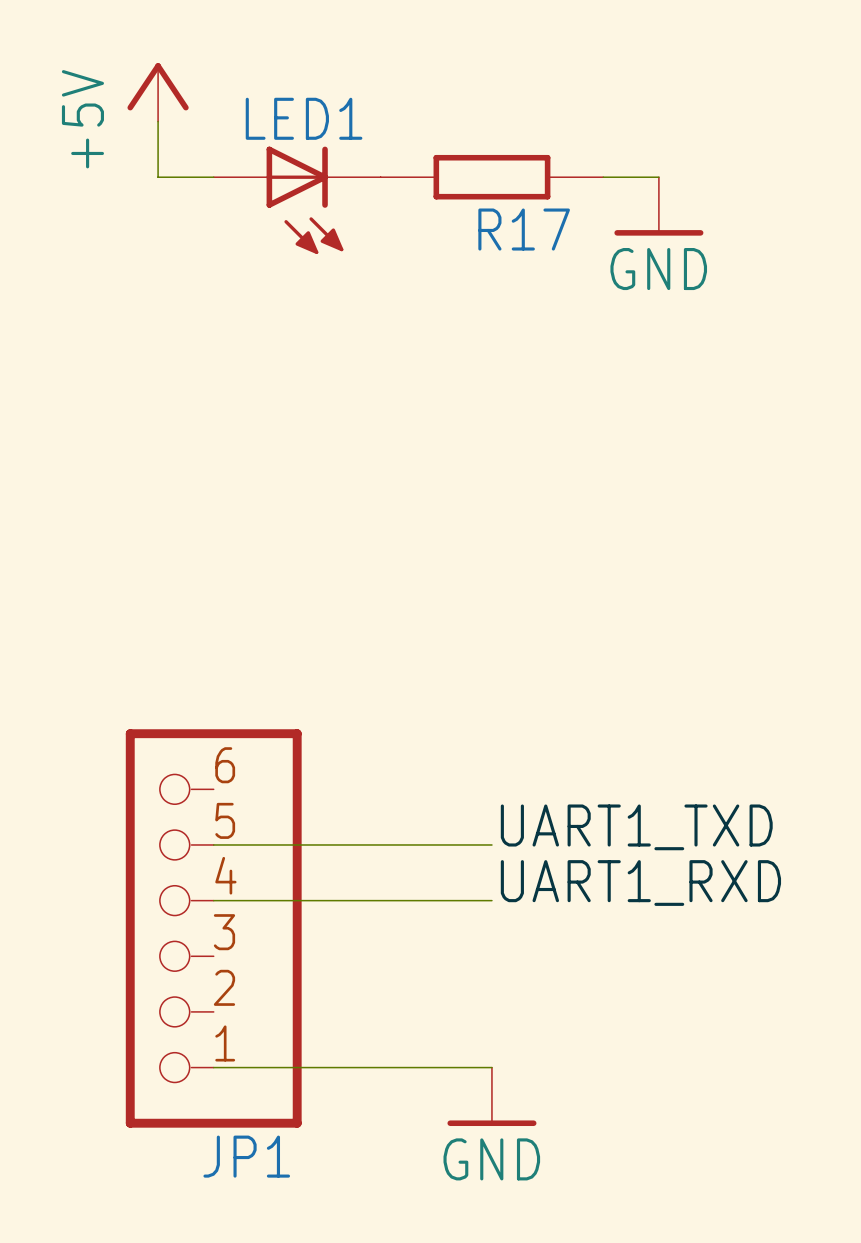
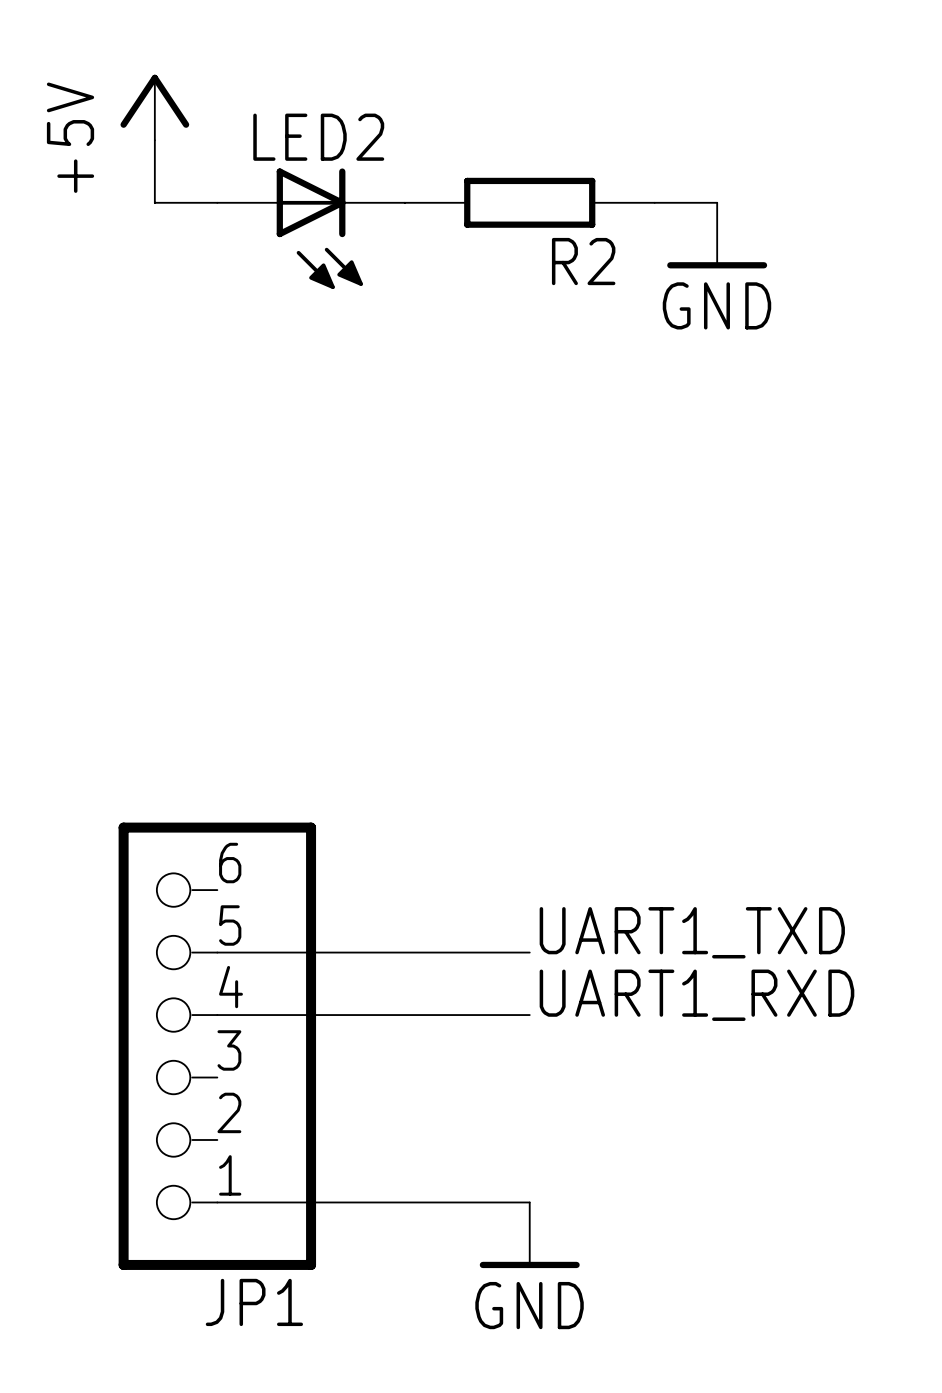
LED1 name: LED1 (304, 118) -> LED2 (318, 137)
R17 name: R17 (524, 229) -> R2 (583, 261)

